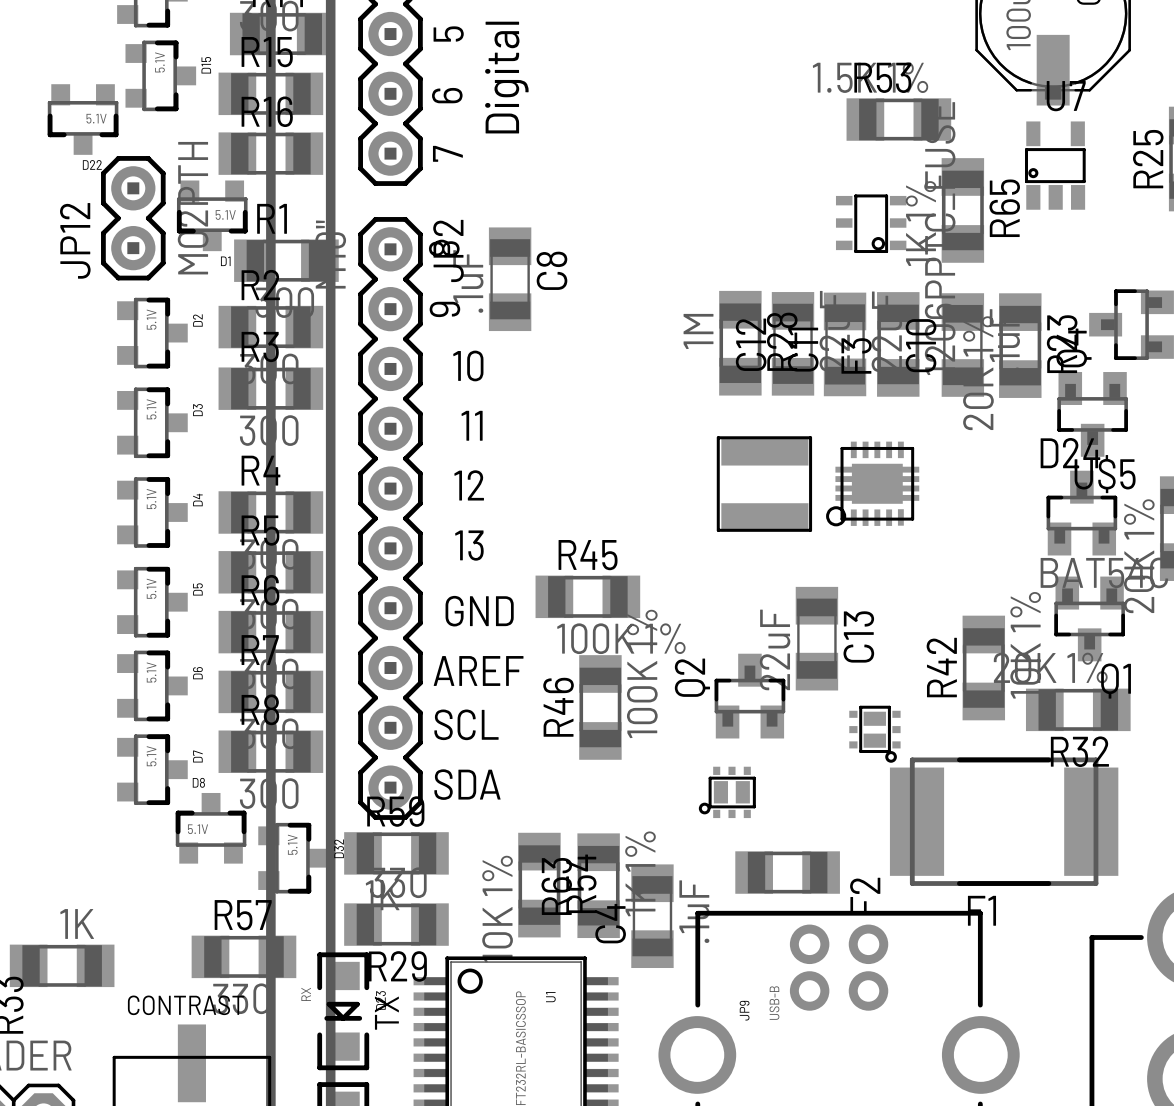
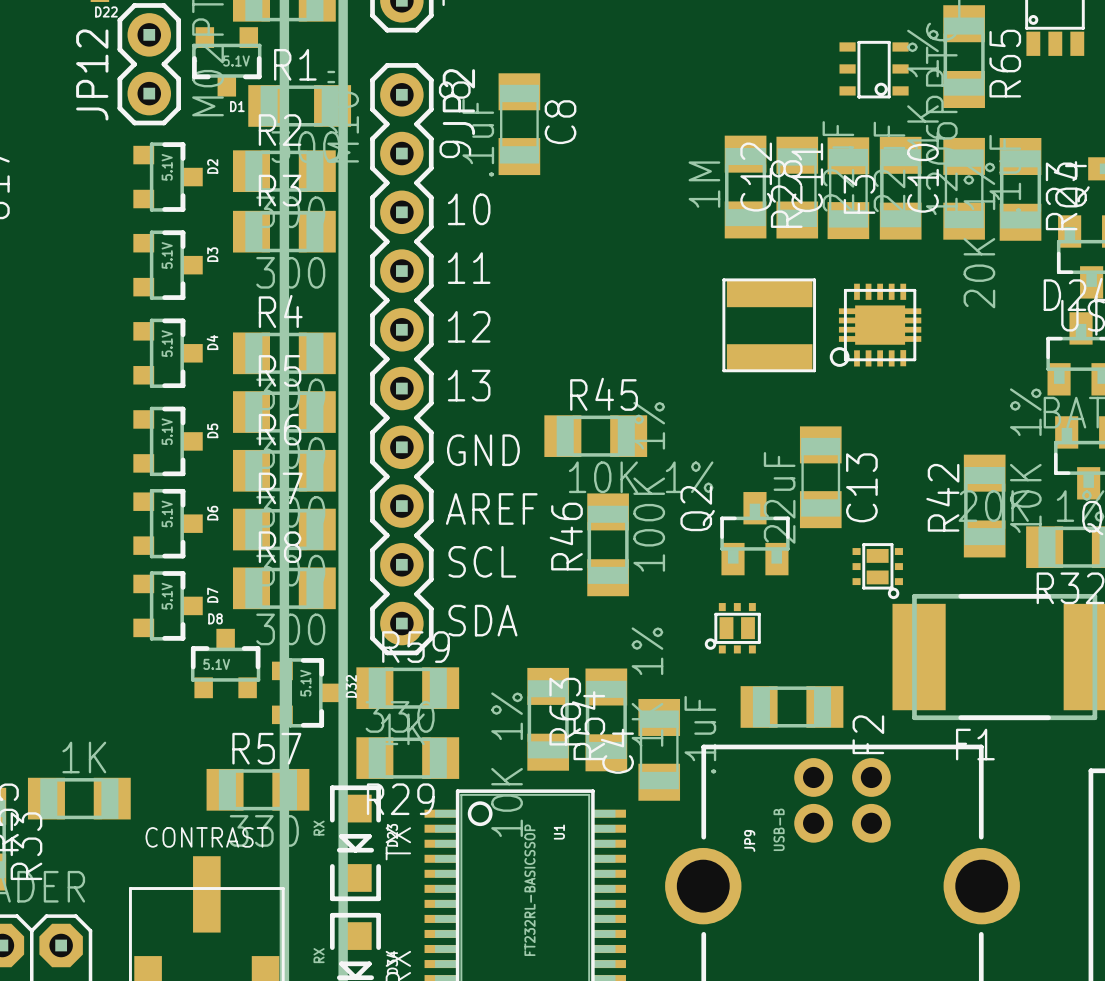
R45 value: 100K 1% (621, 638) -> 10K 1% (641, 477)

